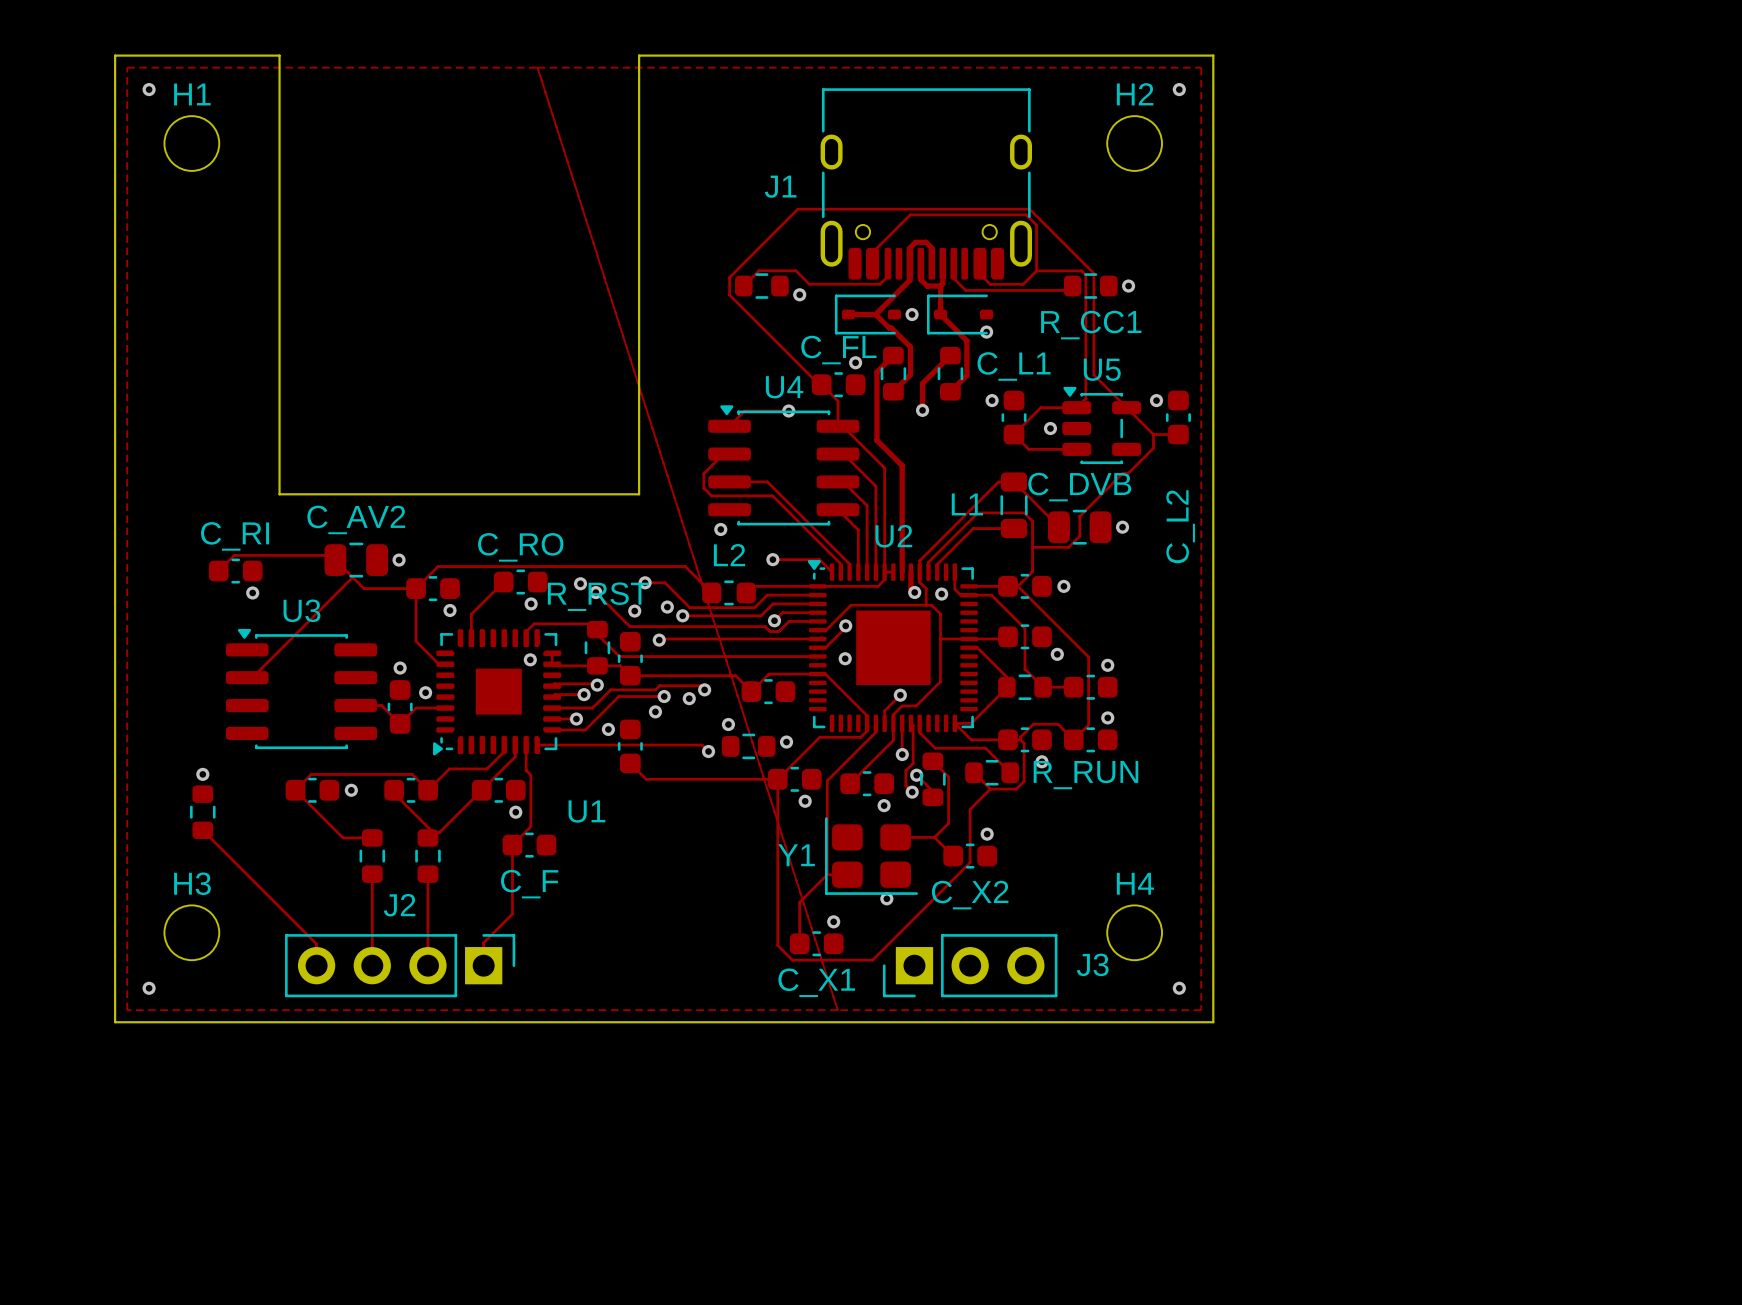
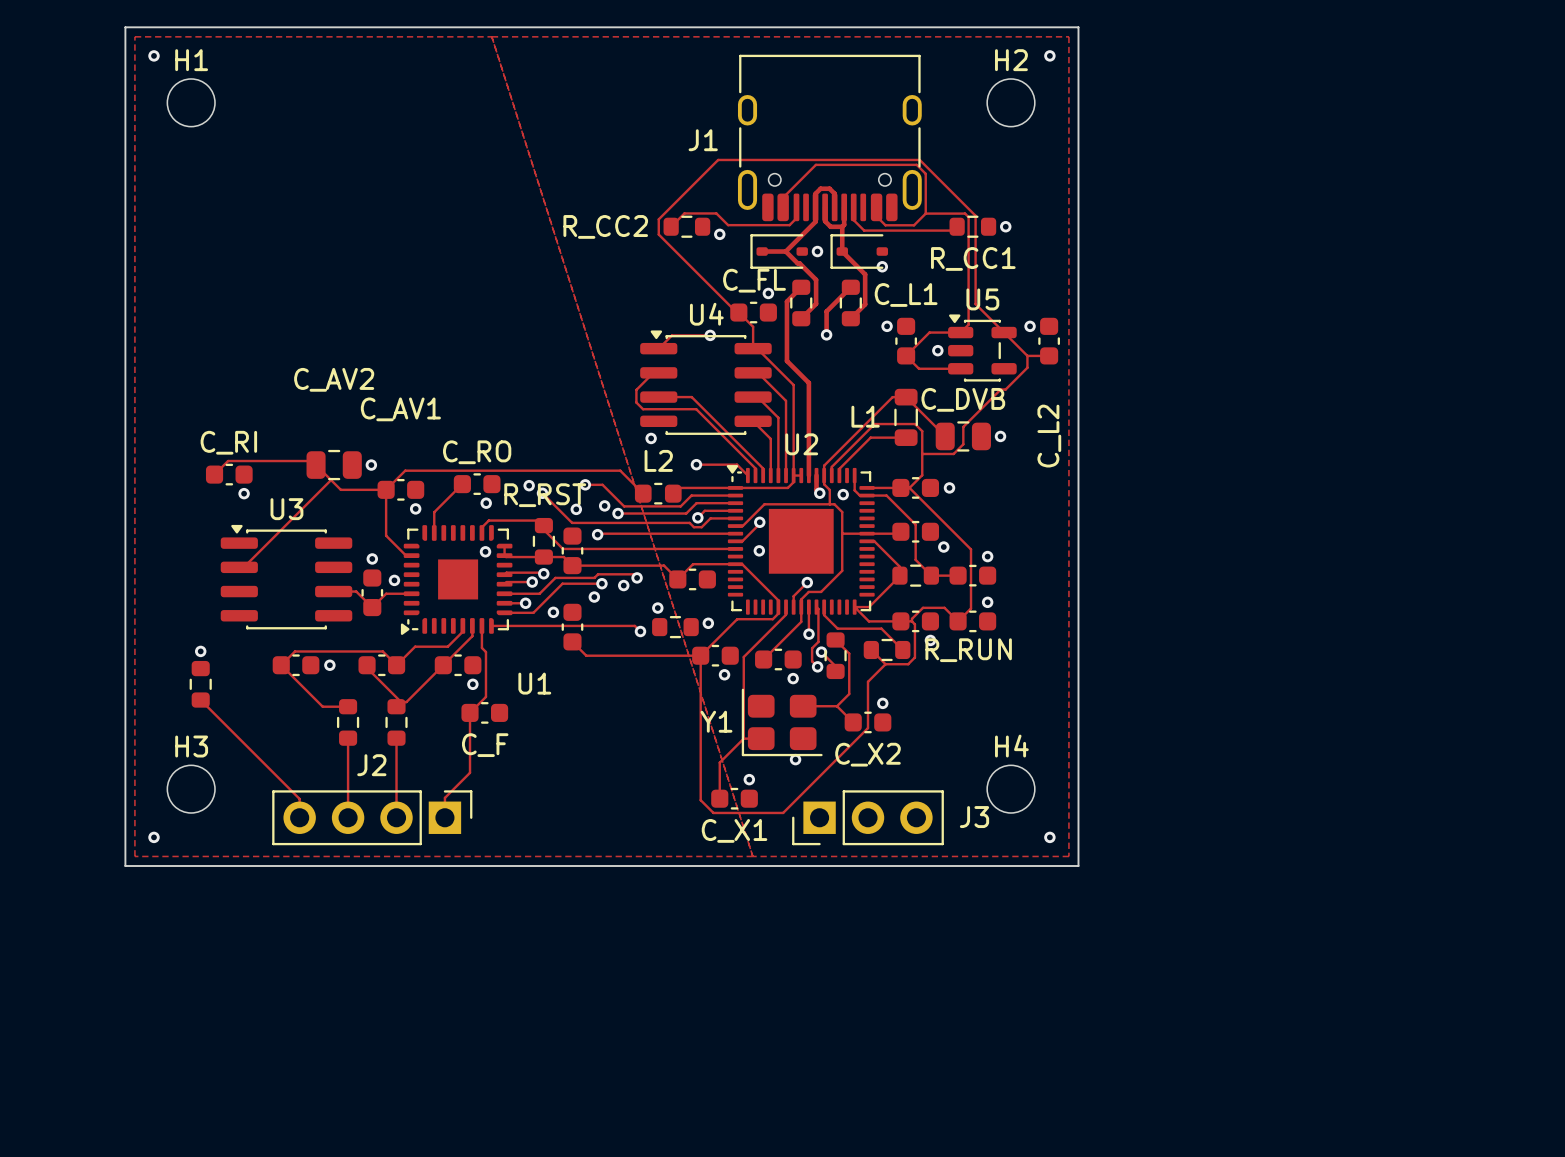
board edge: (115, 55) (279, 55) (279, 494) (639, 494) (639, 55) (1213, 55) (1213, 1022) (115, 1022) (115, 55) -> (125, 27) (125, 866) (1078, 866) (1078, 27) (125, 27)
R_CC2 name: none -> R_CC2 (605, 226)
C_AV1 name: none -> C_AV1 (400, 409)
C_AV2 name position: C_AV2 (356, 519) -> C_AV2 (334, 379)

